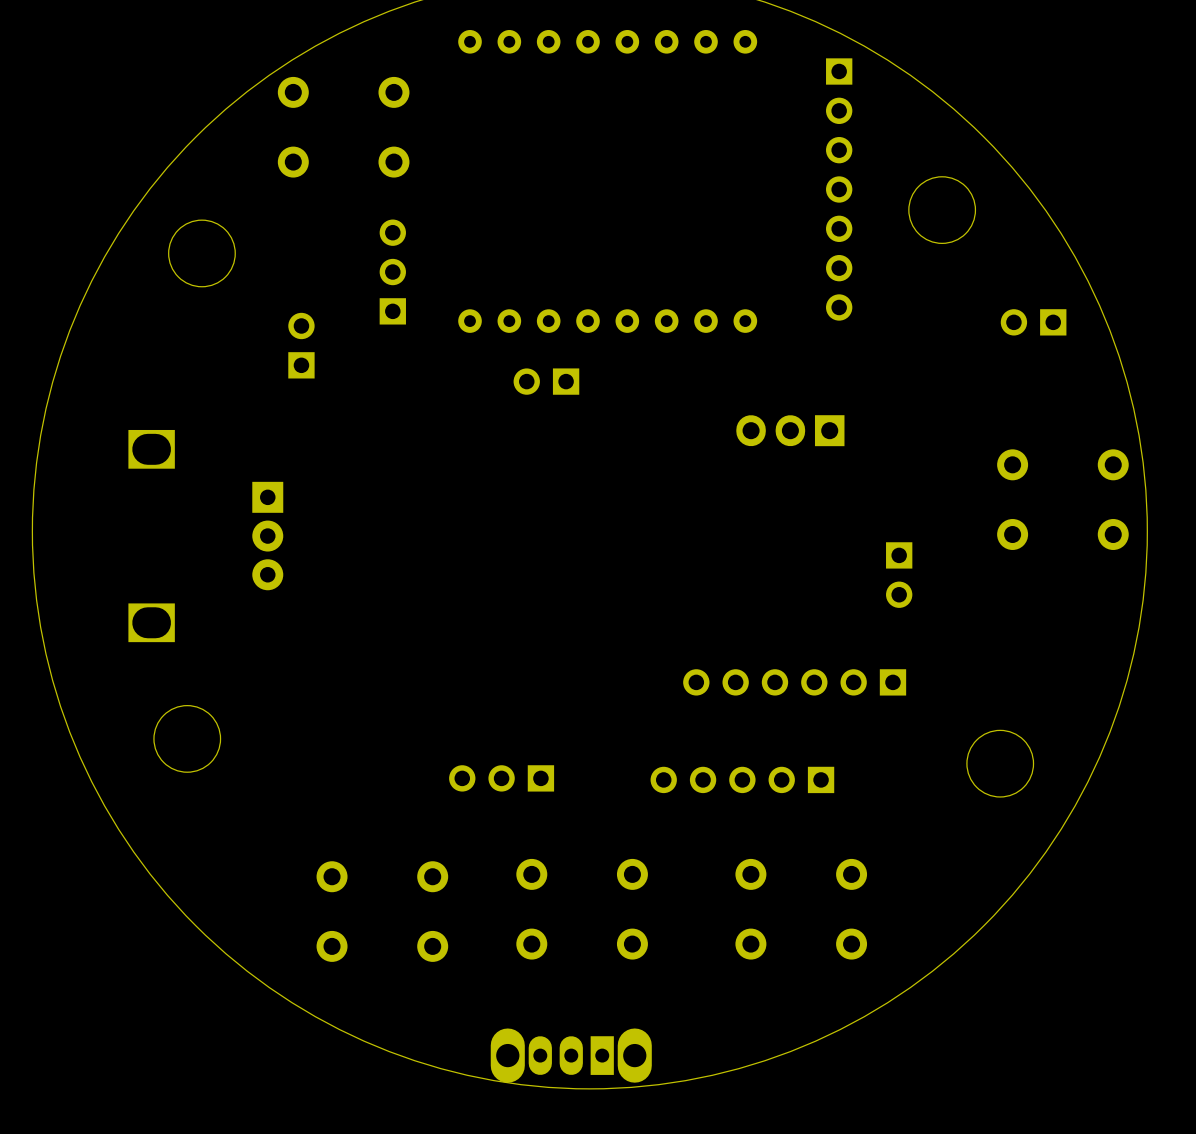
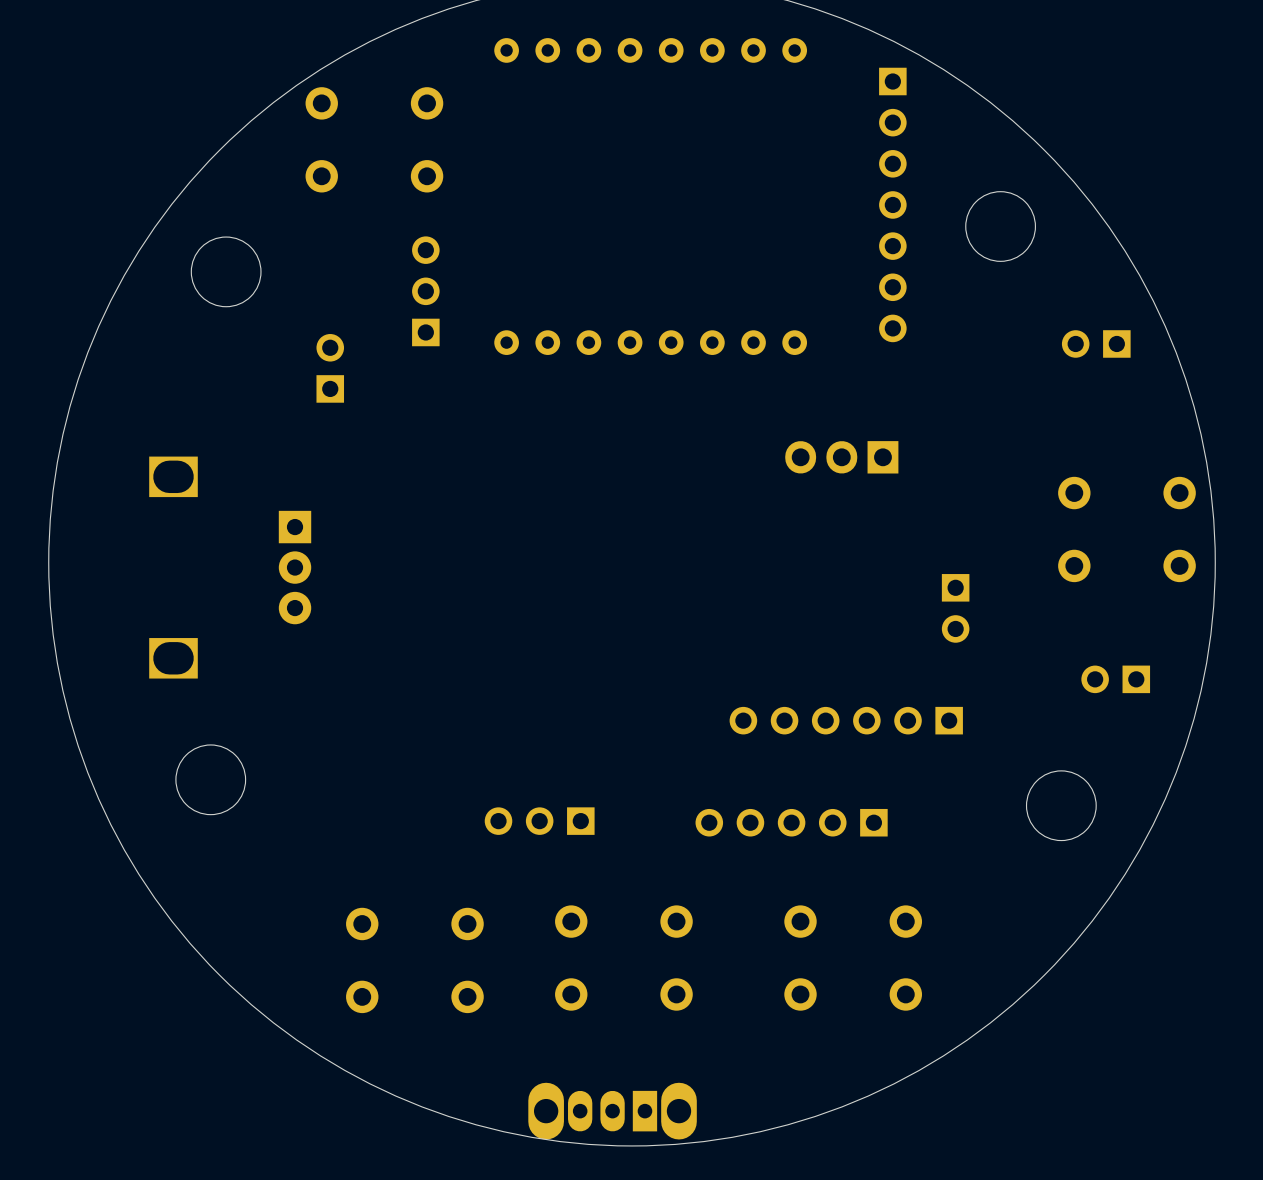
part: (546, 381) -> none
part: none -> (1115, 679)

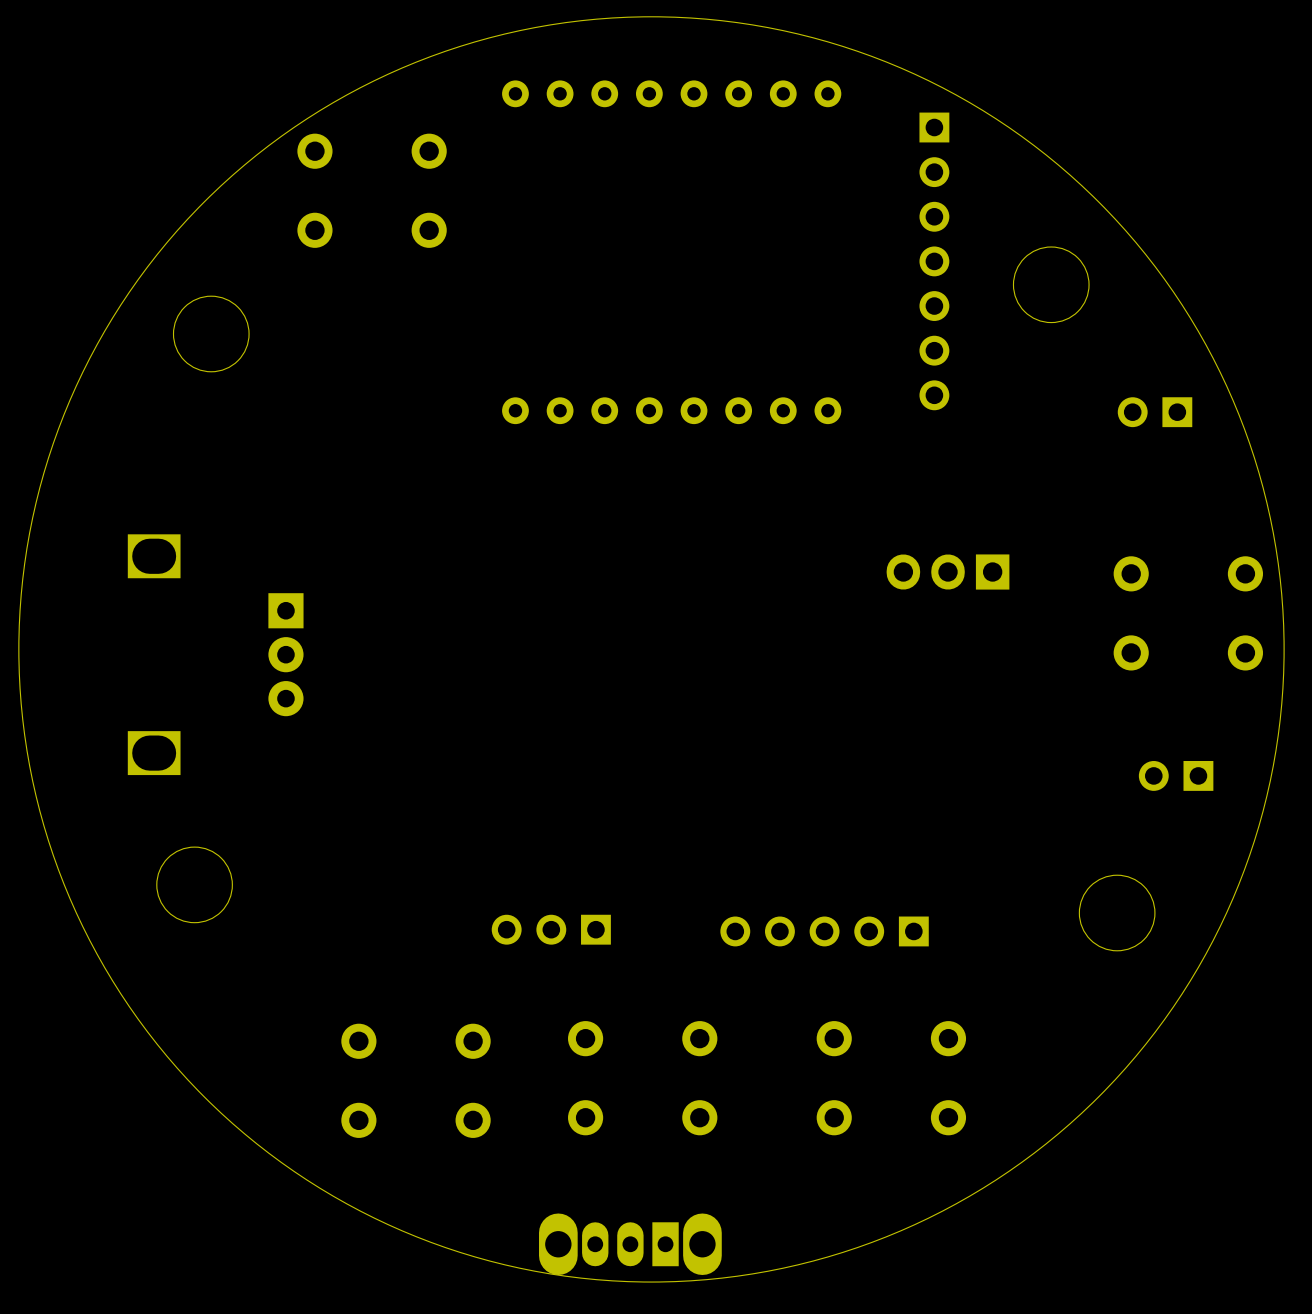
part: (425, 291) -> none
part: (330, 368) -> none
part position: (841, 457) -> (948, 572)
part: (955, 608) -> none
part: (846, 720) -> none

